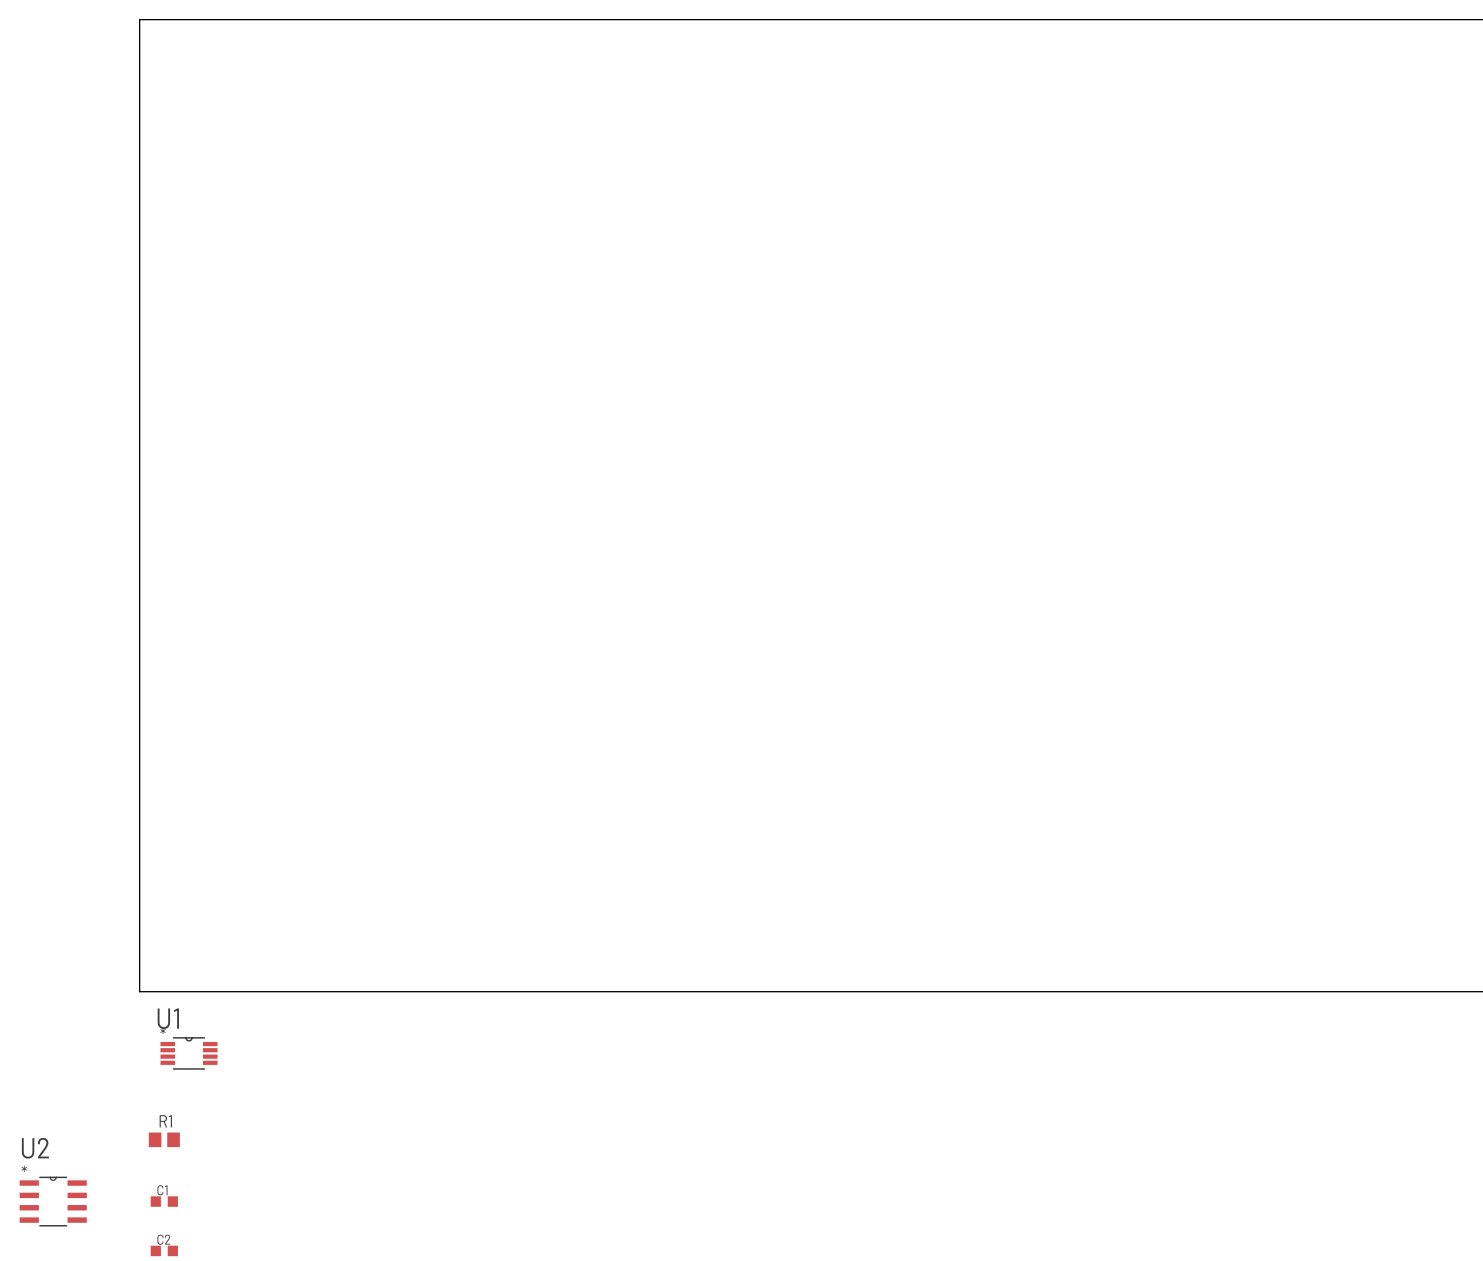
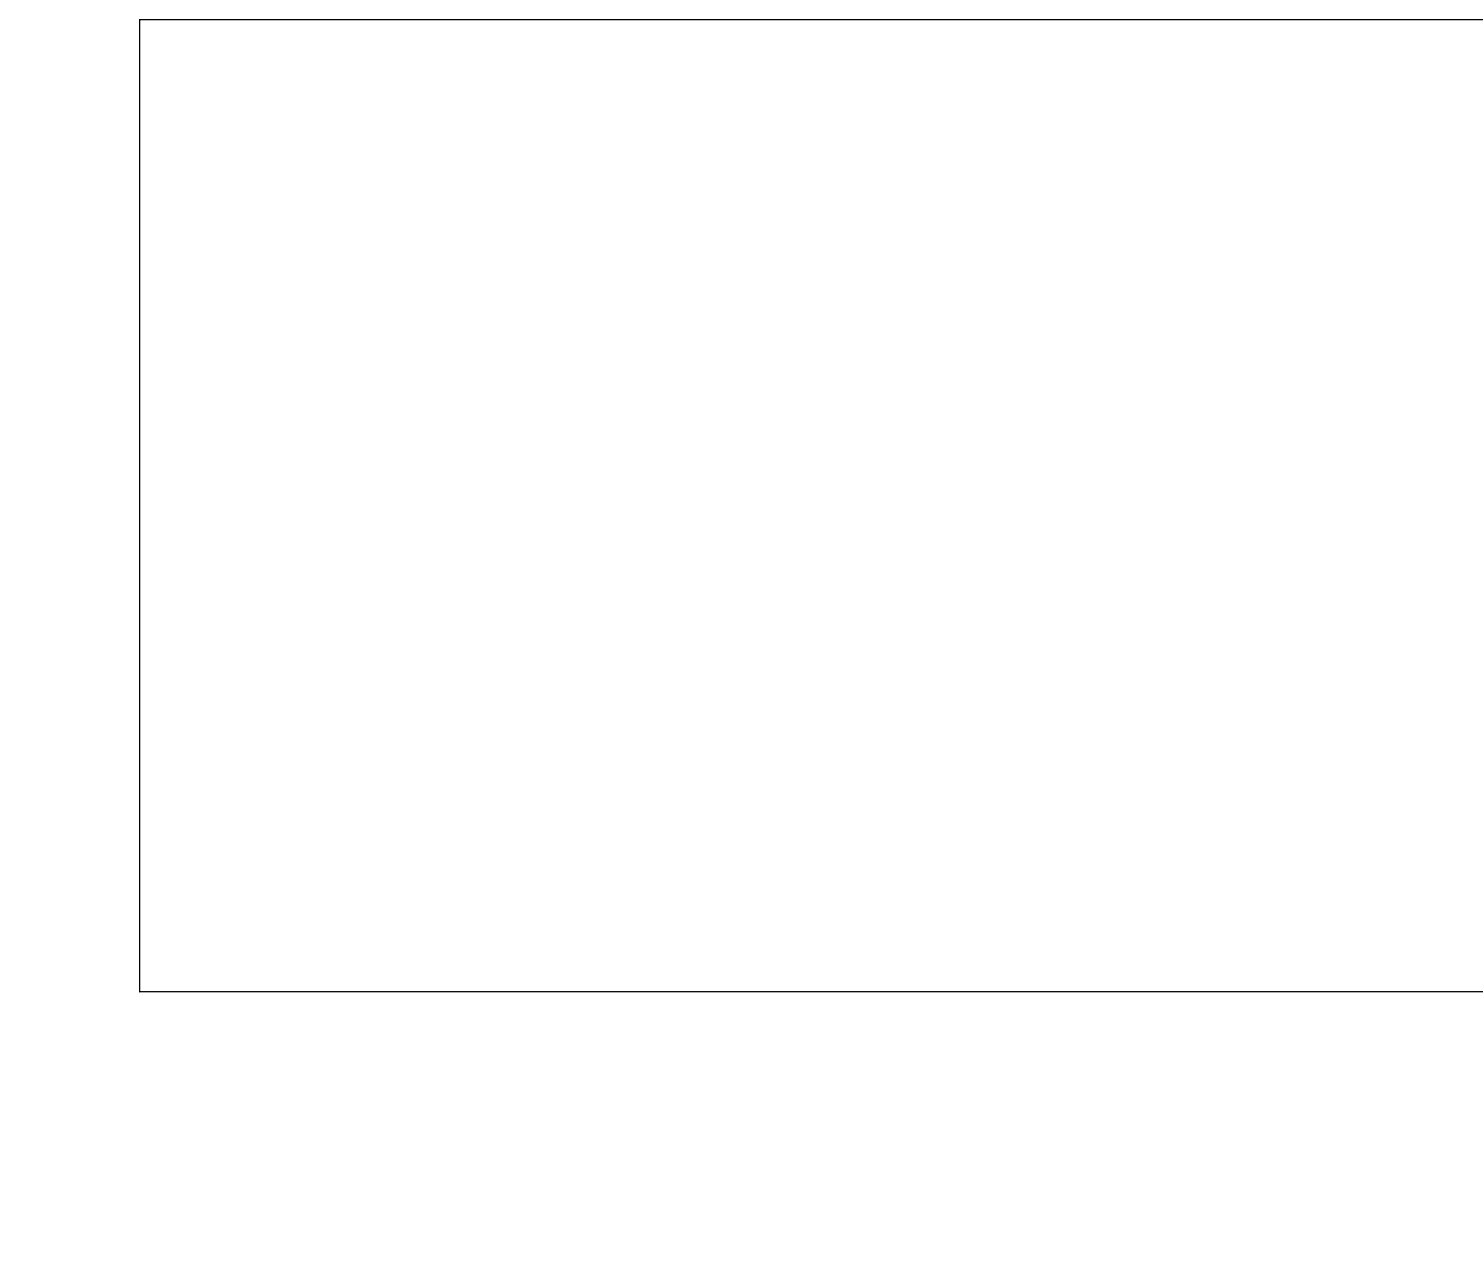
U1: (189, 1053) -> none
R1: (164, 1139) -> none
U2: (53, 1201) -> none
C1: (164, 1201) -> none
C2: (164, 1250) -> none

